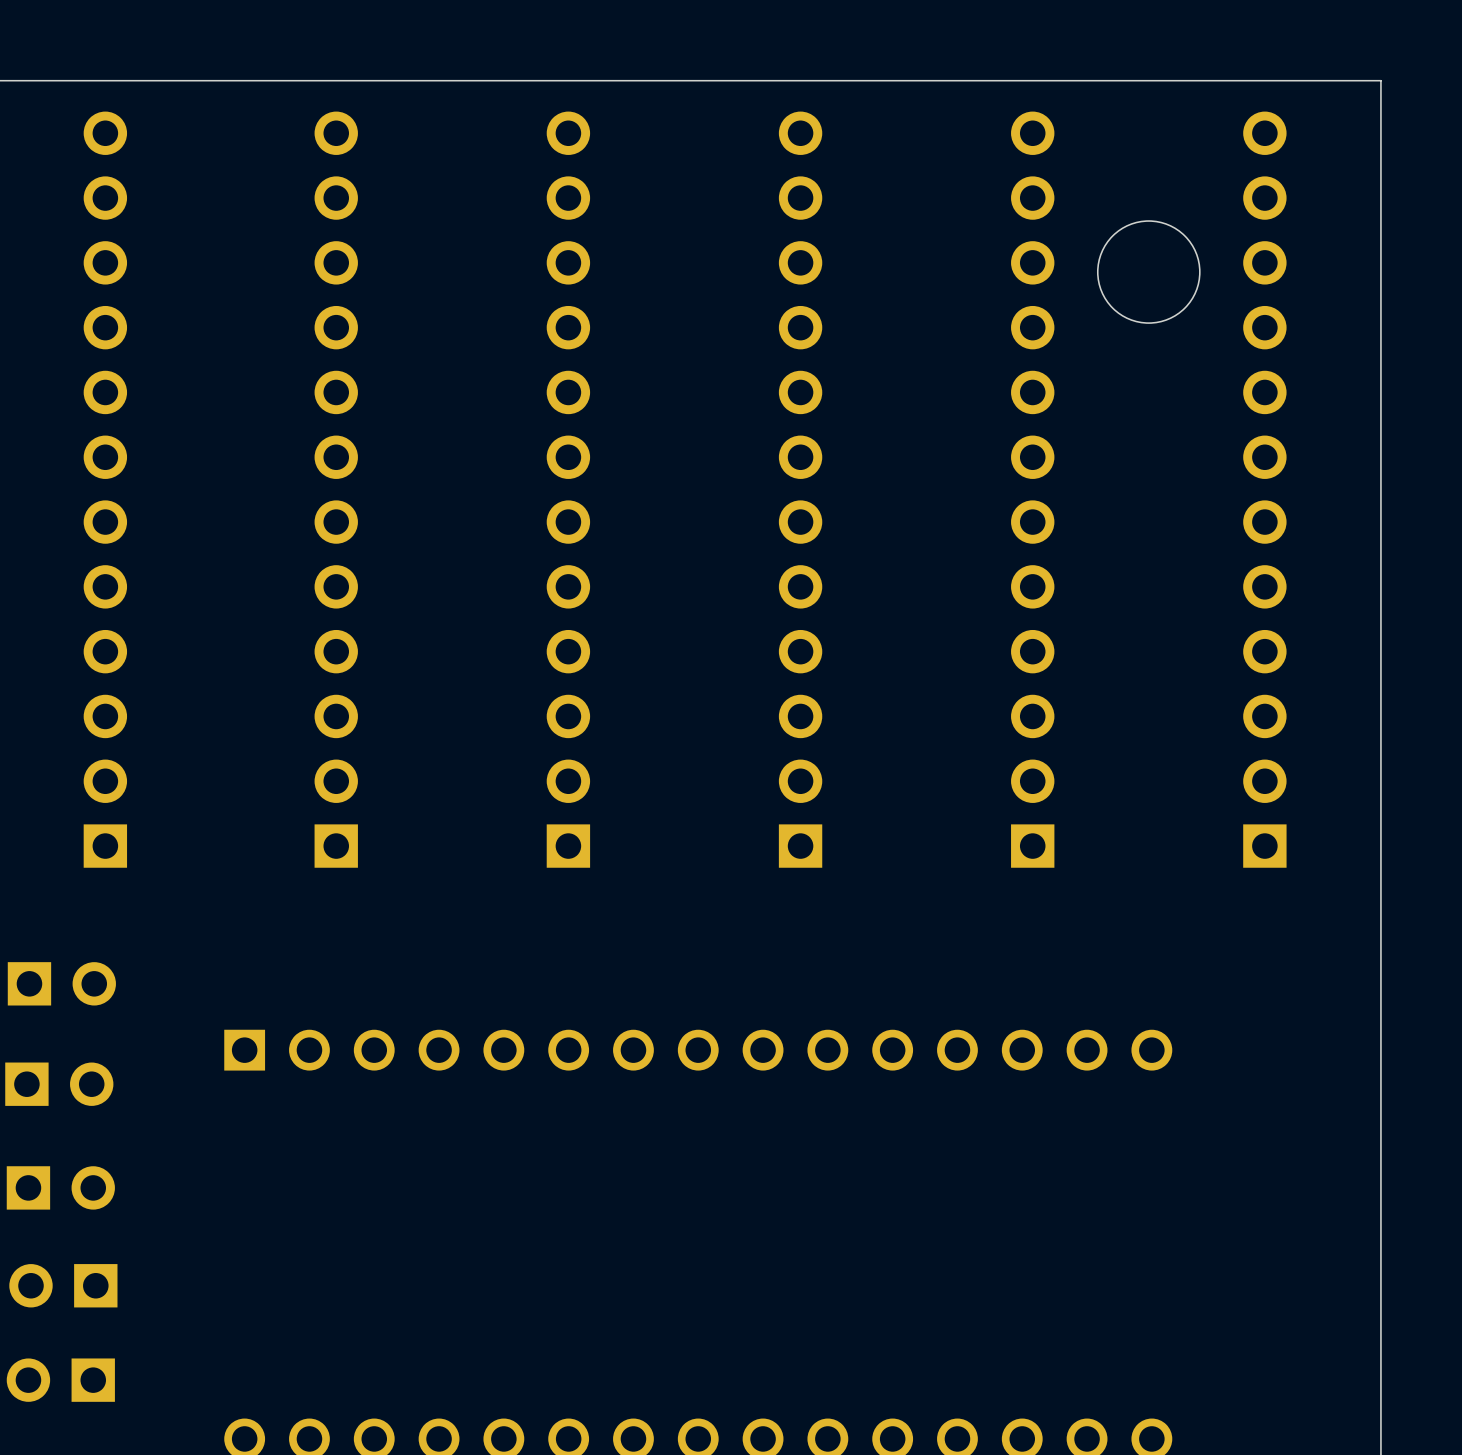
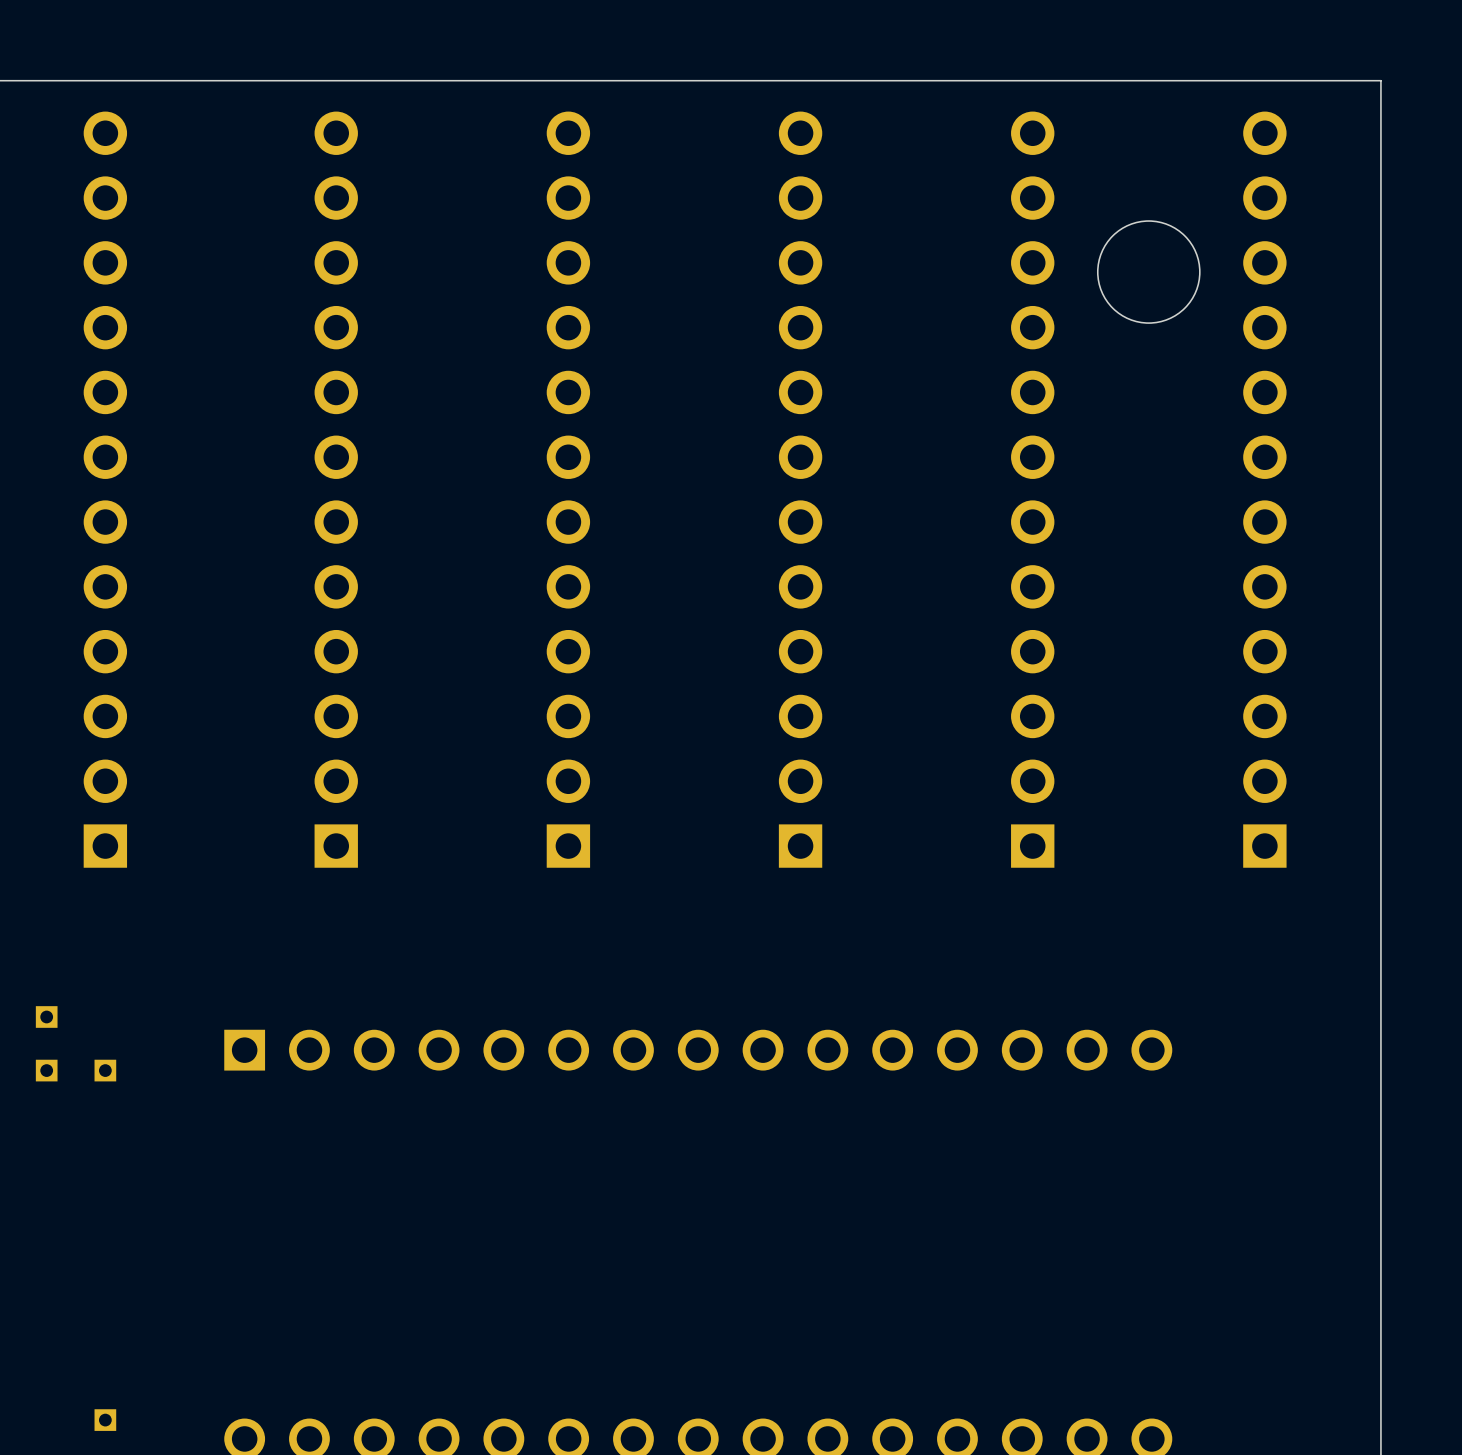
part: (61, 983) -> none
part: none -> (46, 1016)
part footprint: [5, 1062, 114, 1106] -> [35, 1059, 58, 1082]
part: none -> (105, 1070)
part: (60, 1187) -> none
part: (63, 1285) -> none
part: (60, 1380) -> none
part: none -> (105, 1420)

